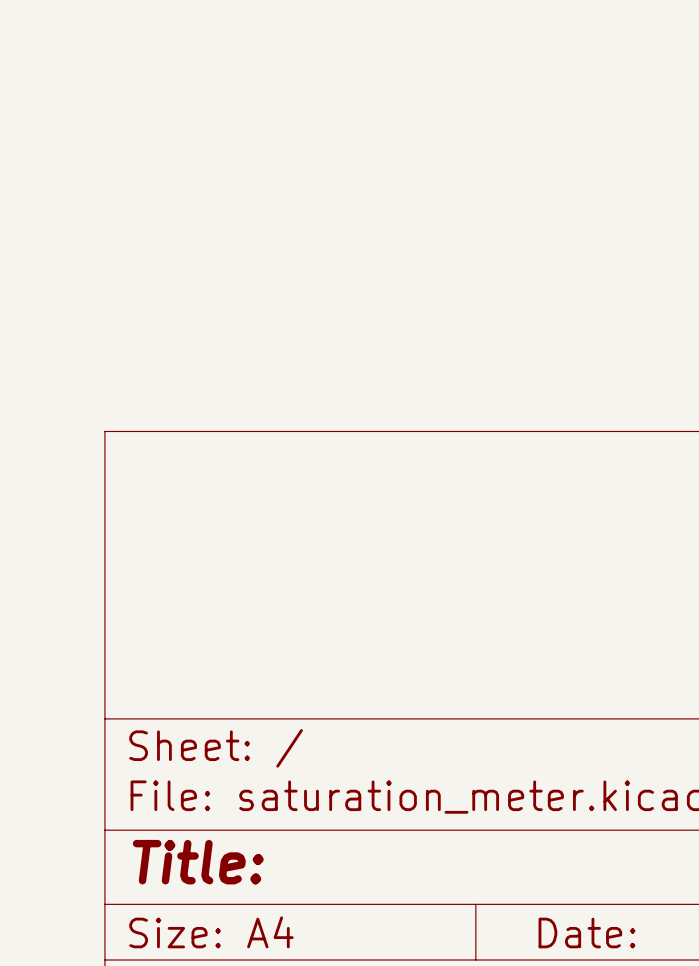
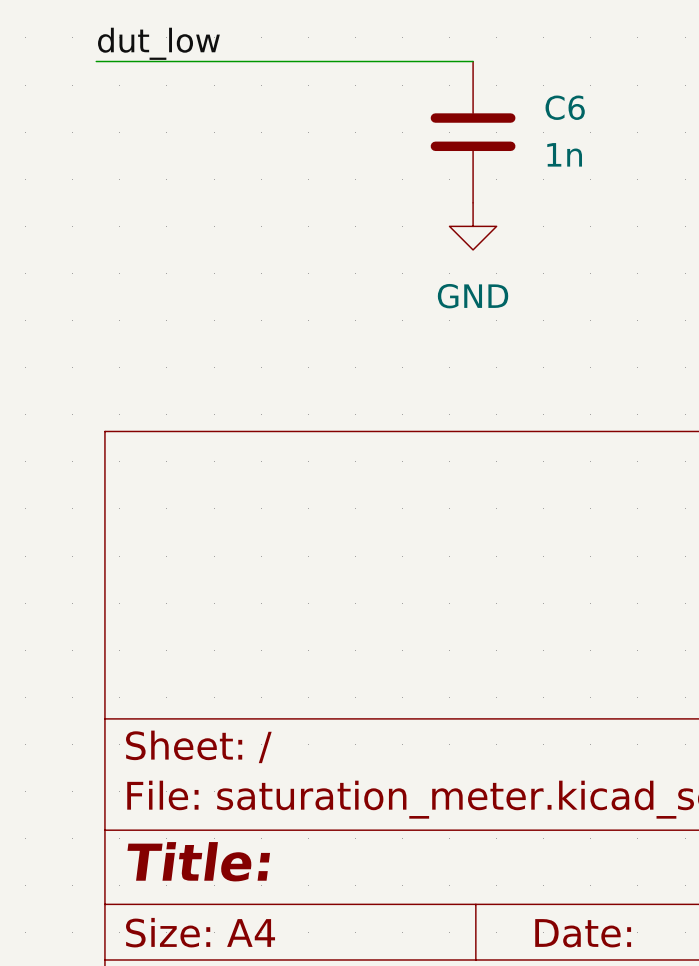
label: none -> dut_low (158, 43)
wire: none -> (96, 61) (473, 61)
C6: none -> 1n (473, 132)
power symbol: none -> GND (473, 226)

